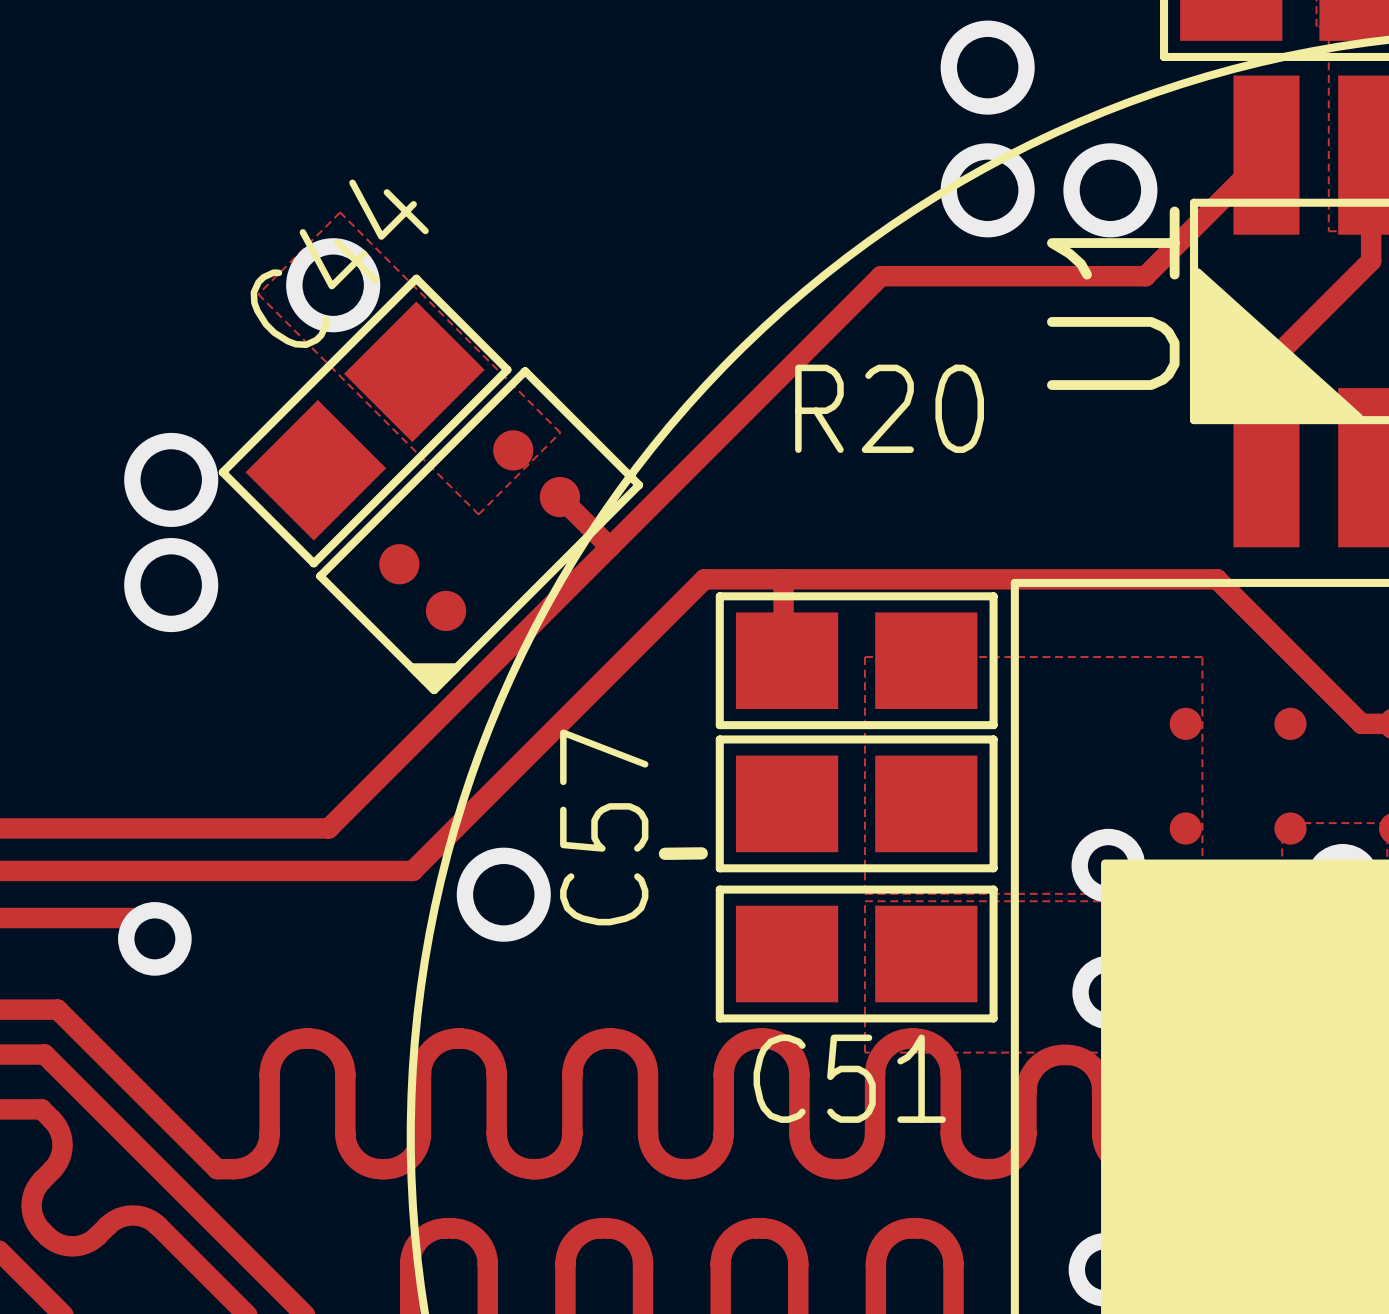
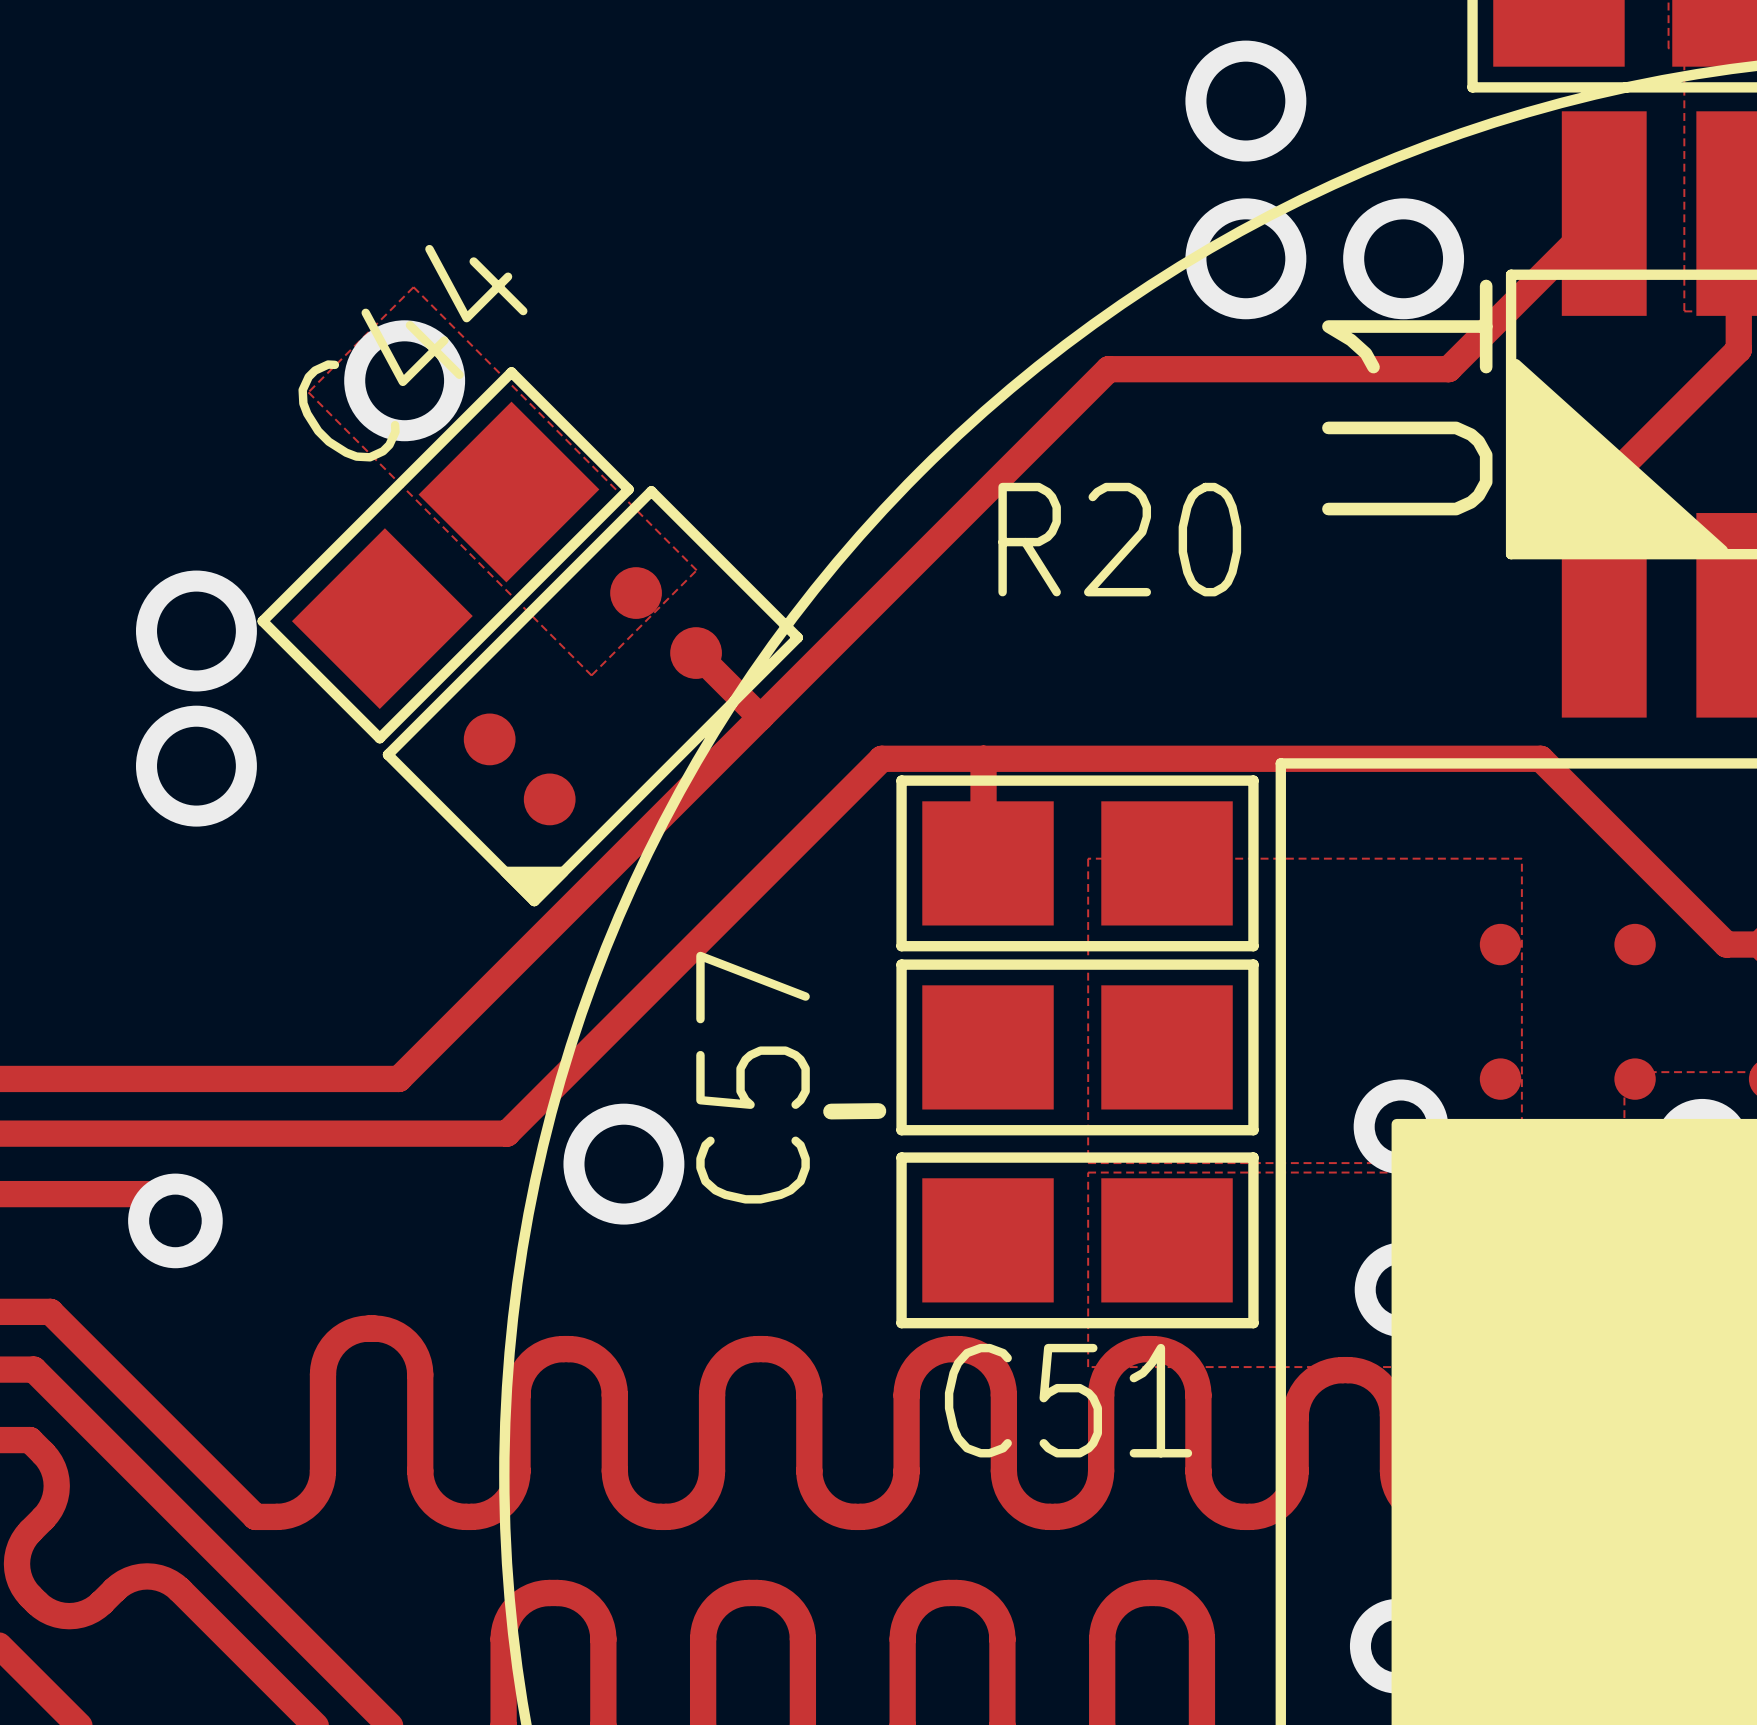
track: (269, 1074) (272, 1060) (280, 1049) (291, 1041) (305, 1038) (323, 1041) (334, 1049) (342, 1060) (345, 1074) -> (322, 1395) (323, 1368) (326, 1356) (332, 1346) (340, 1338) (351, 1332) (368, 1328) (391, 1332) (402, 1338) (410, 1346) (416, 1356) (419, 1368) (420, 1395)

